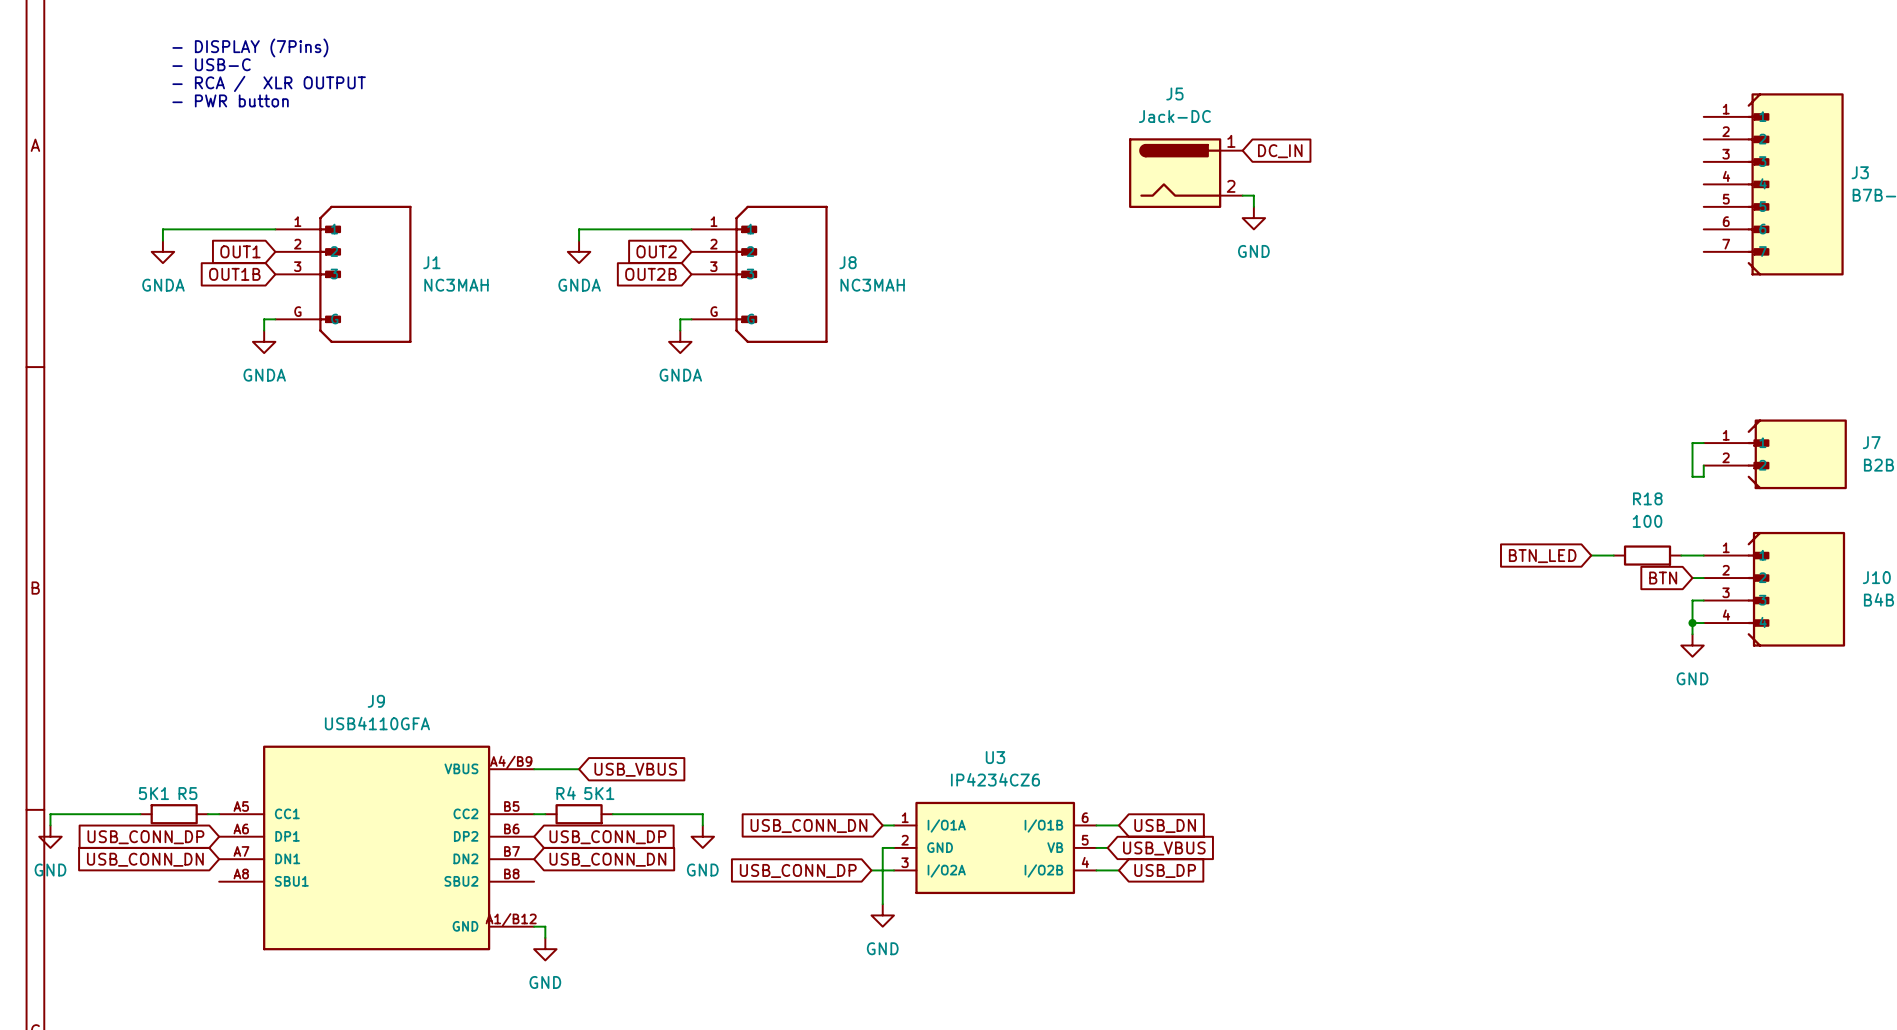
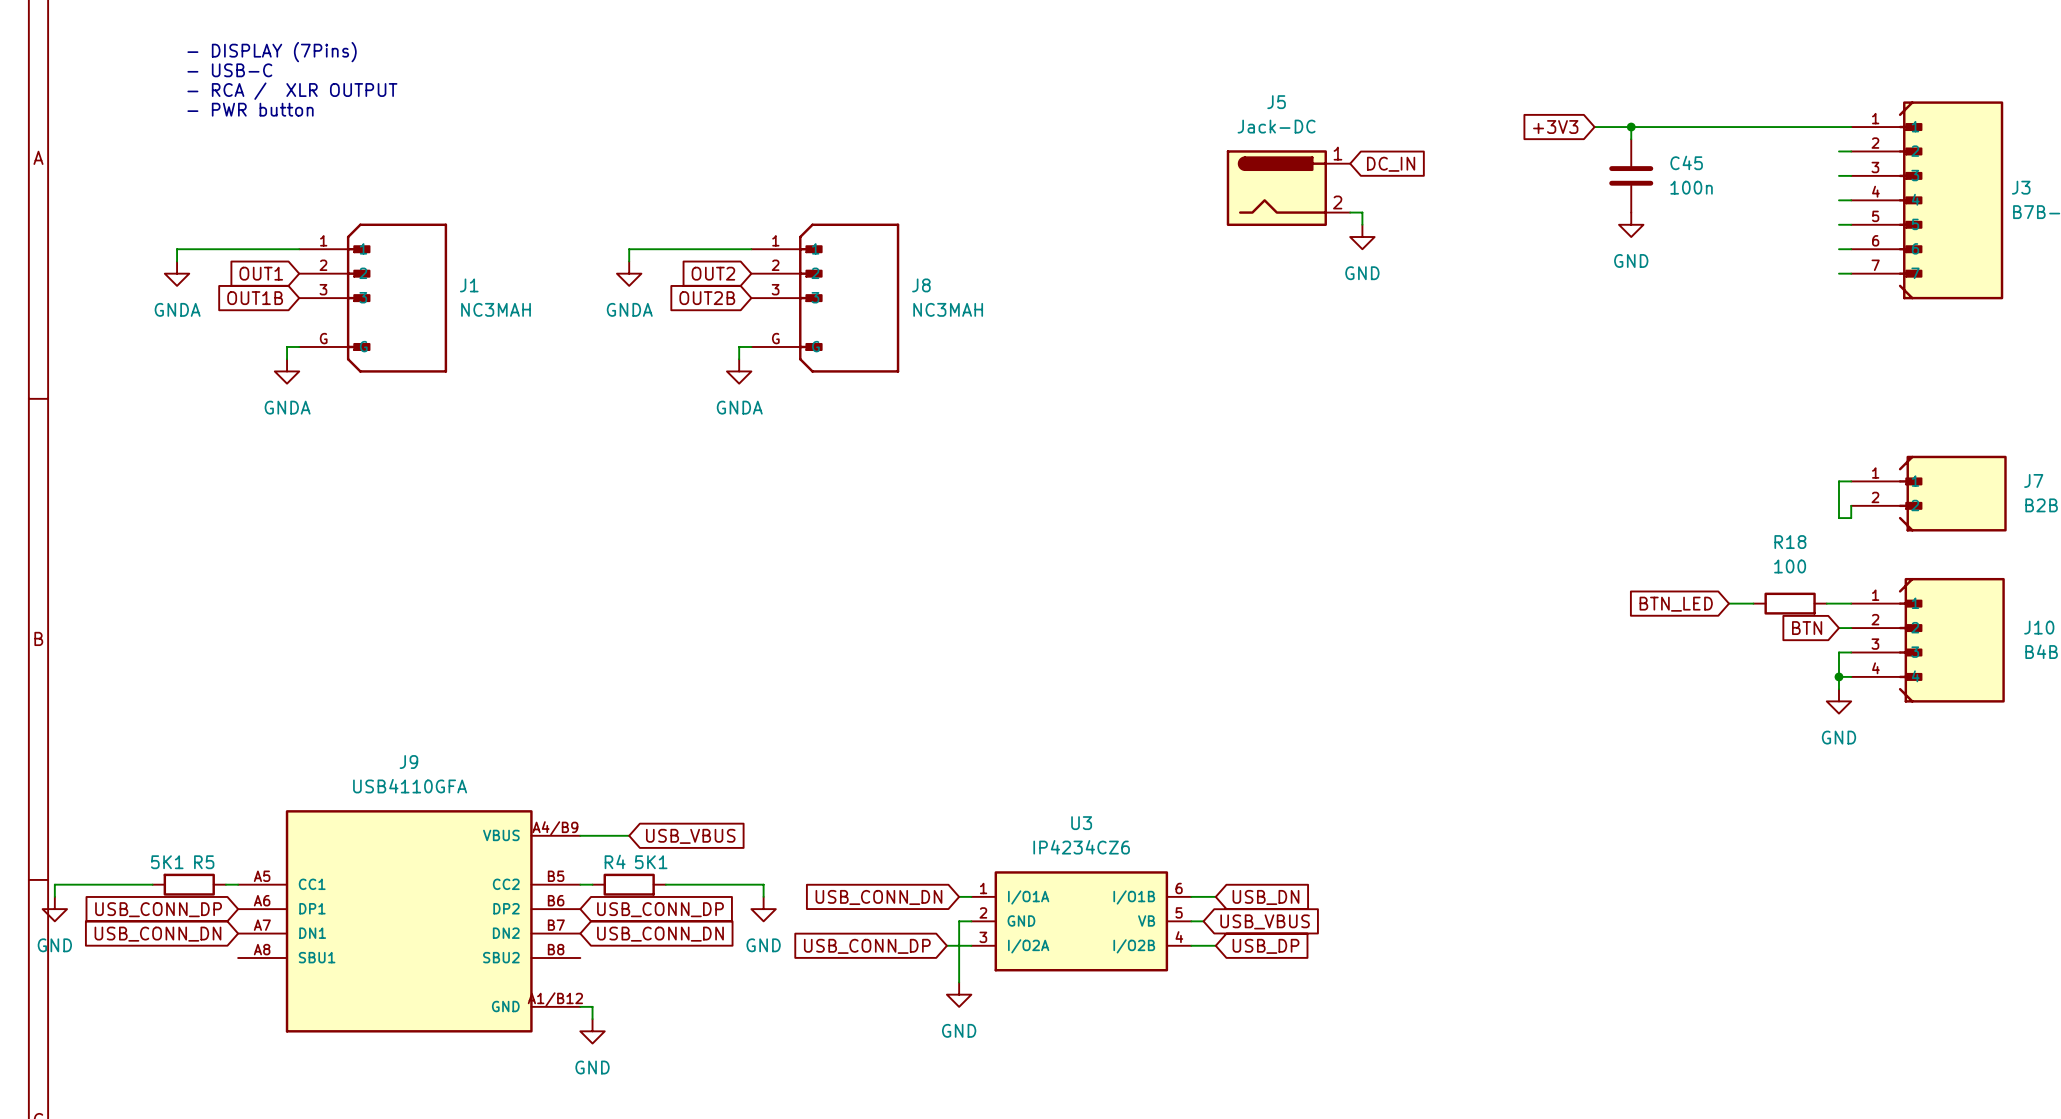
global label: none -> +3V3 (1555, 127)
wire: none -> (1594, 127) (1851, 127)
wire: none -> (1631, 127) (1631, 139)
junction: none -> (1631, 127)
wire: none -> (1838, 151) (1851, 151)
C45: none -> 100n (1631, 175)
wire: none -> (1838, 175) (1851, 175)
wire: none -> (1838, 200) (1851, 200)
power symbol: none -> GND (1631, 224)
wire: none -> (1838, 224) (1851, 224)
wire: none -> (1838, 249) (1851, 249)
wire: none -> (1838, 273) (1851, 273)

